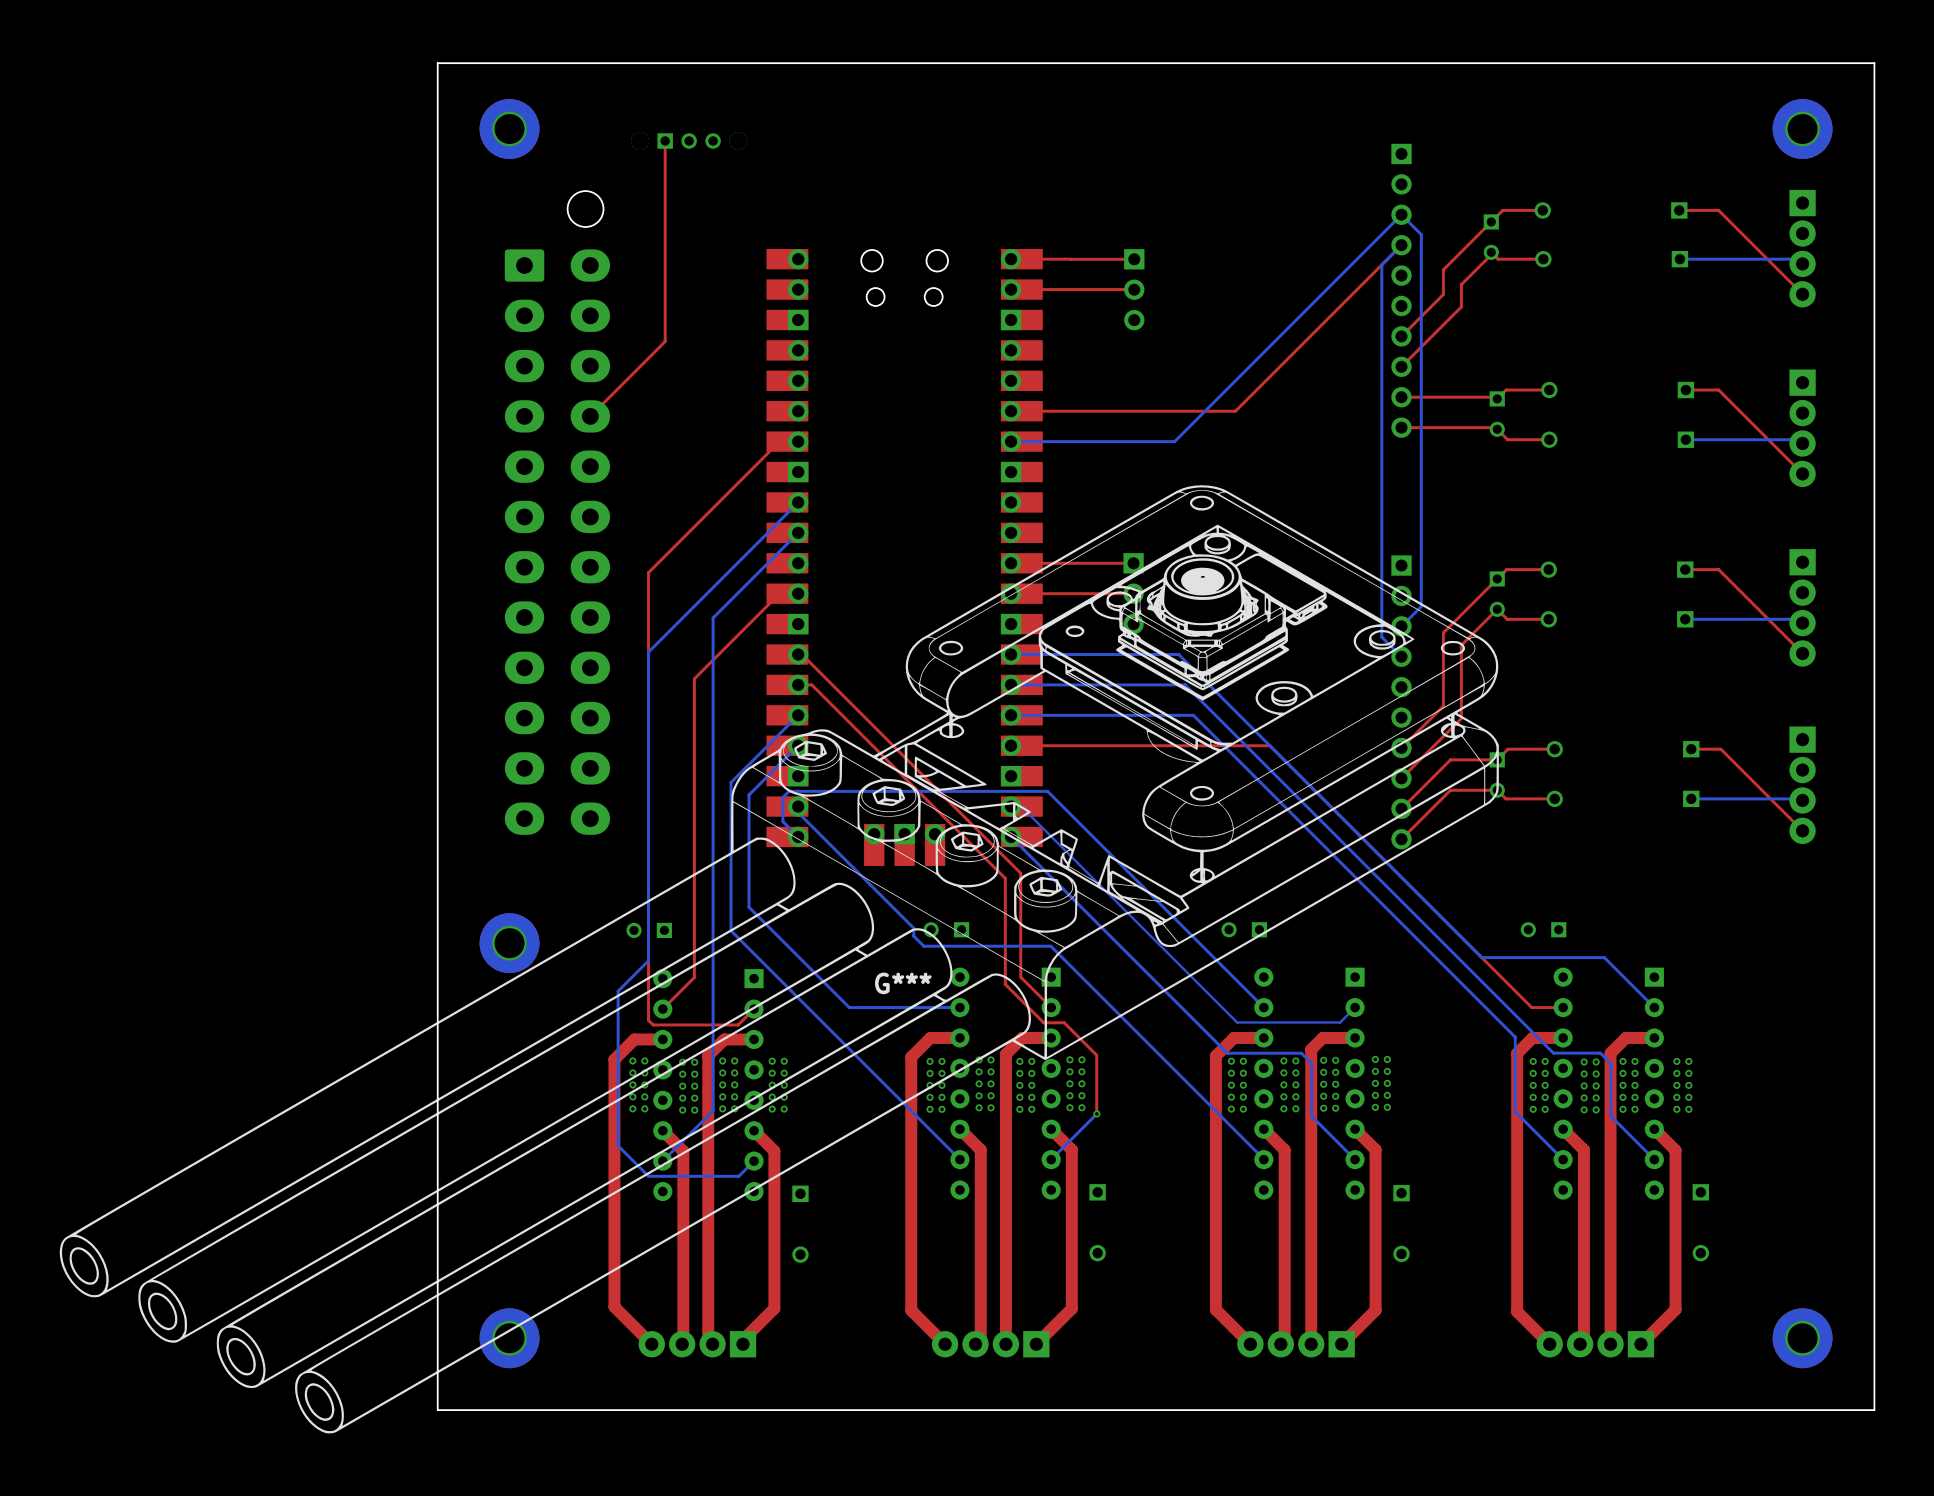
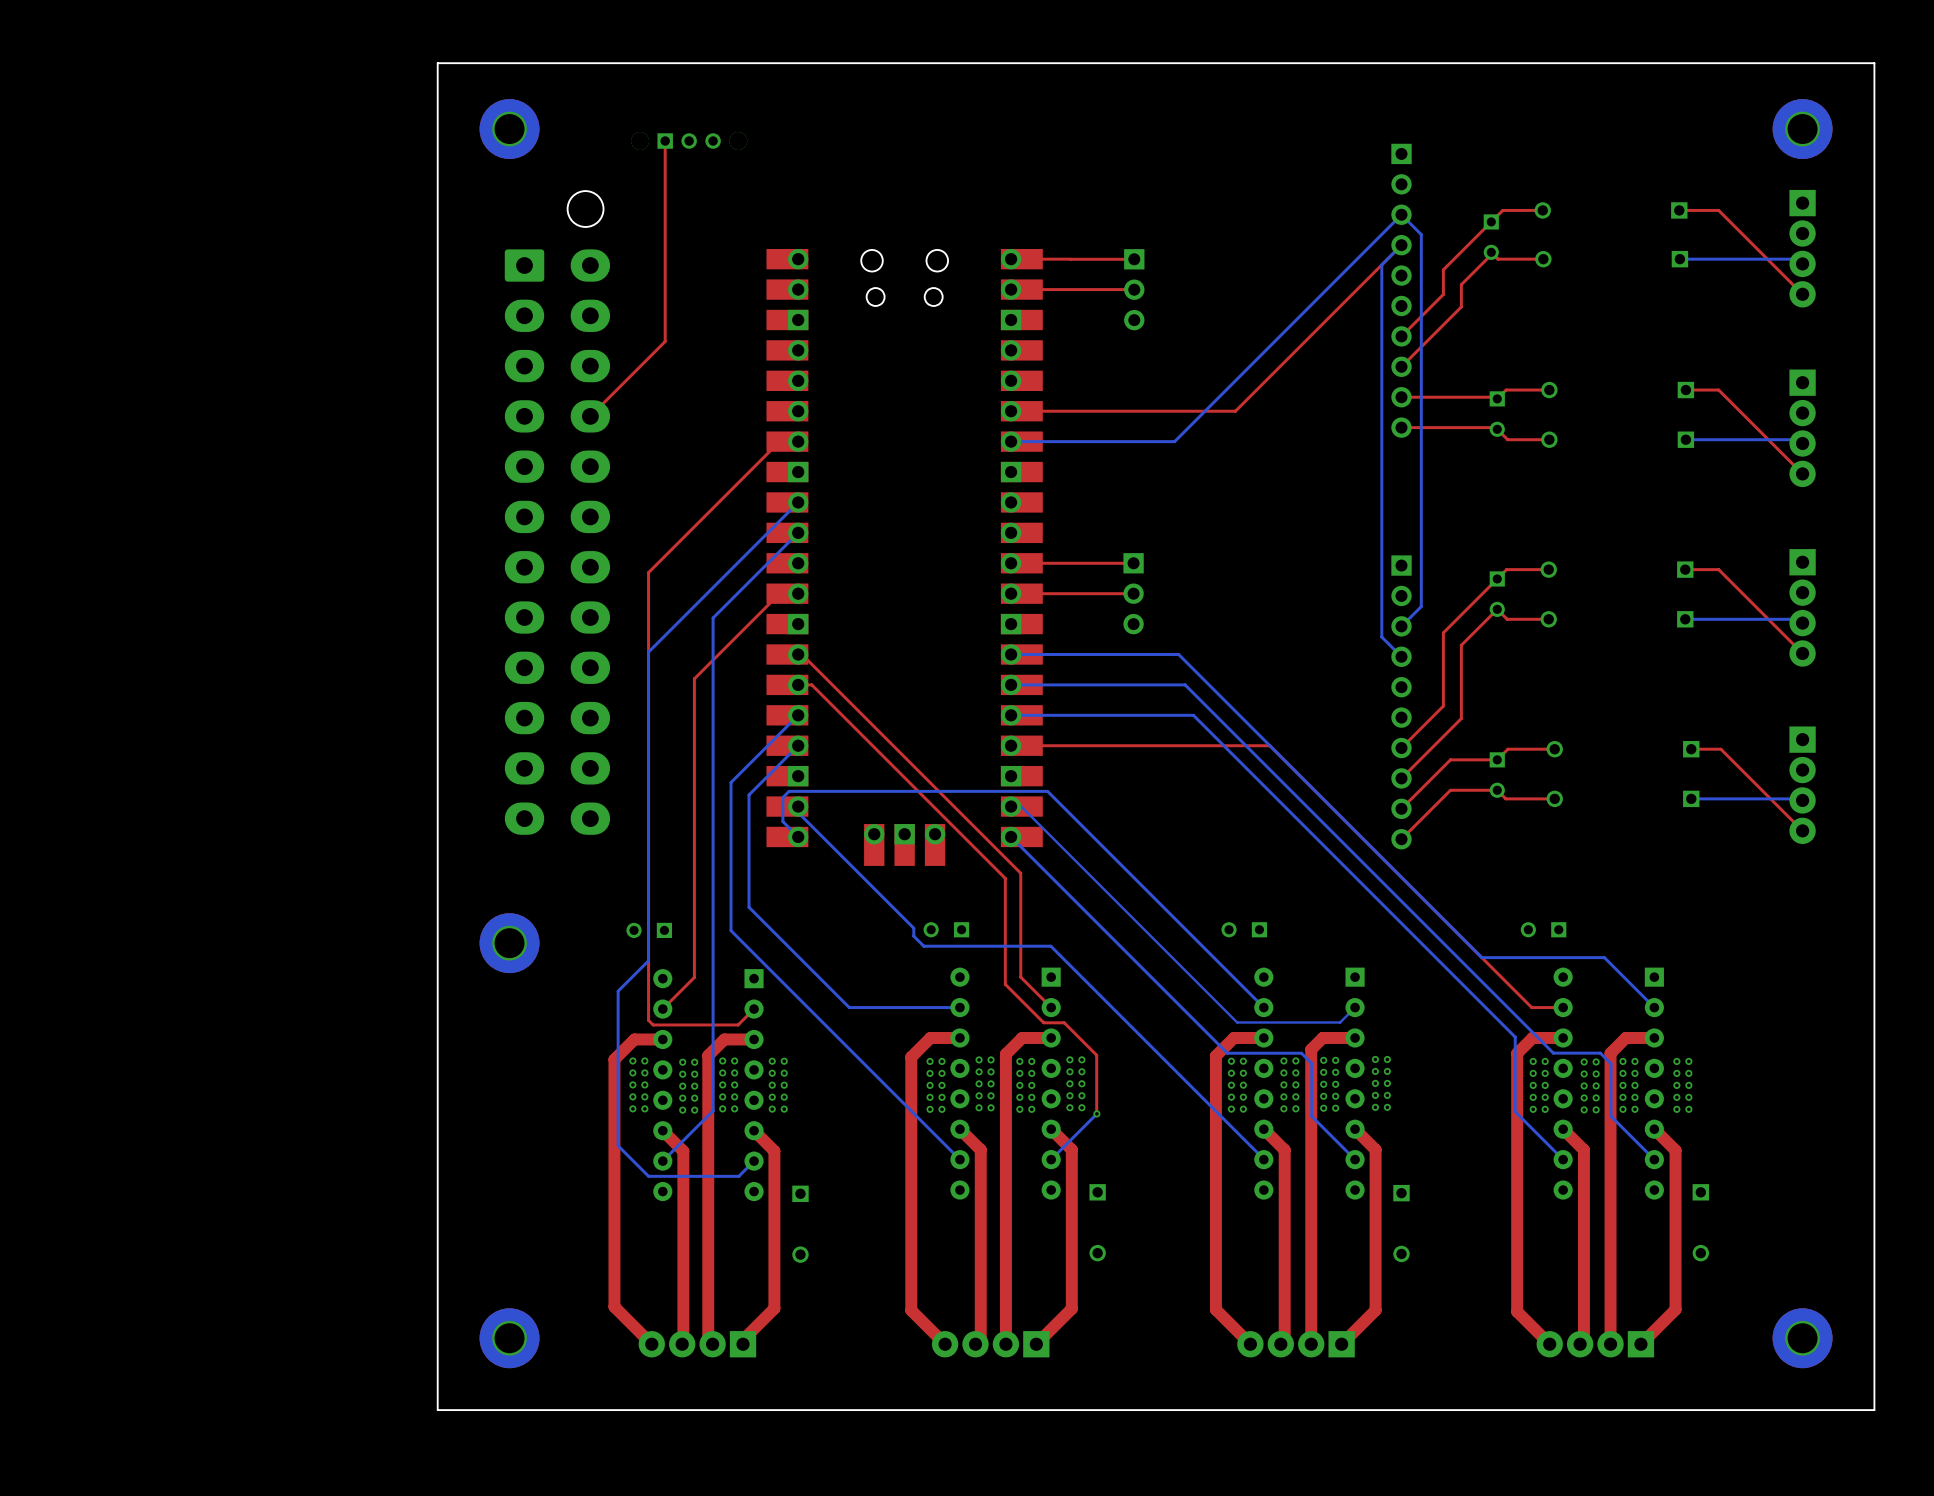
G***: (779, 959) -> none

